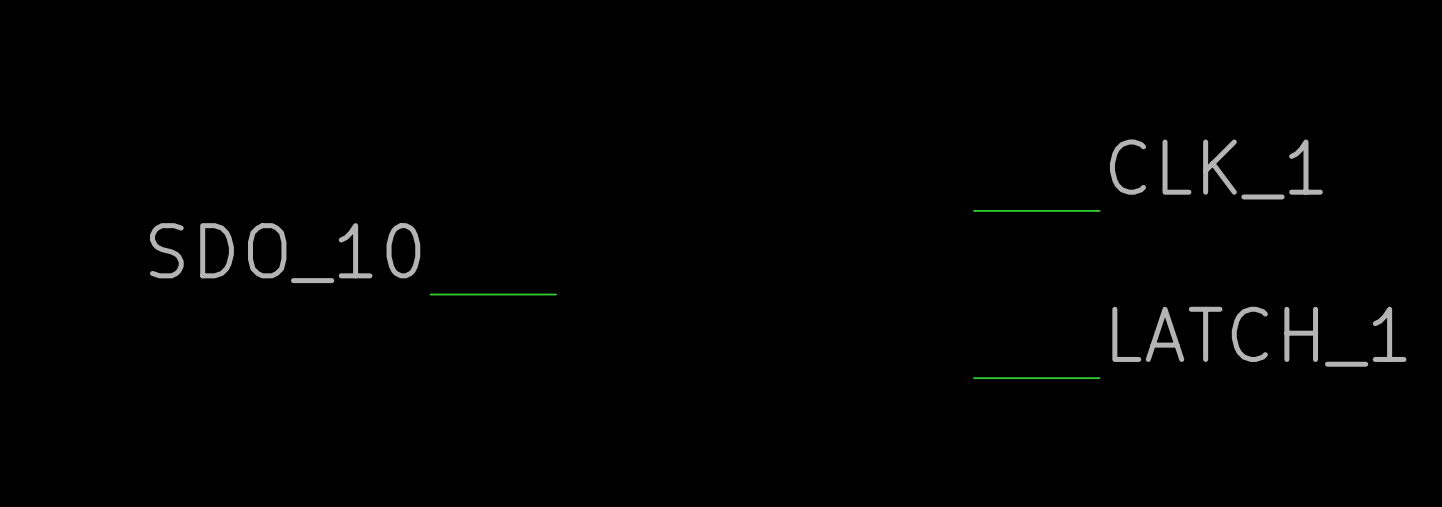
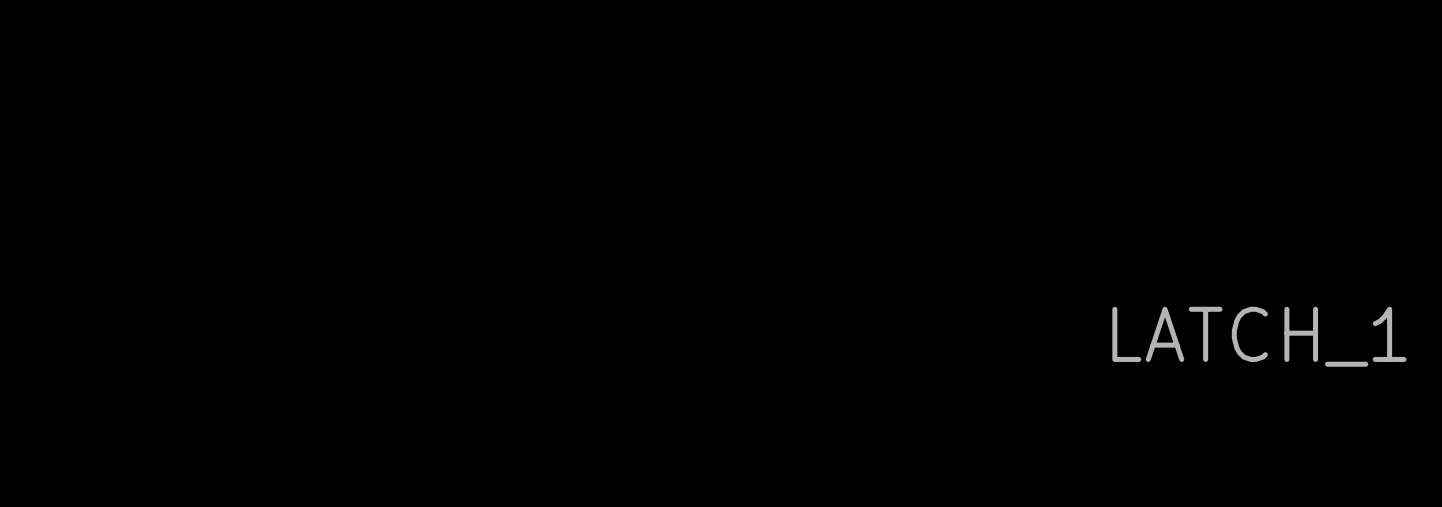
label: CLK_1 (1216, 169) -> none
wire: (974, 210) (1099, 210) -> none
label: SDO_10 (285, 253) -> none
wire: (430, 294) (556, 294) -> none
wire: (974, 378) (1099, 378) -> none

